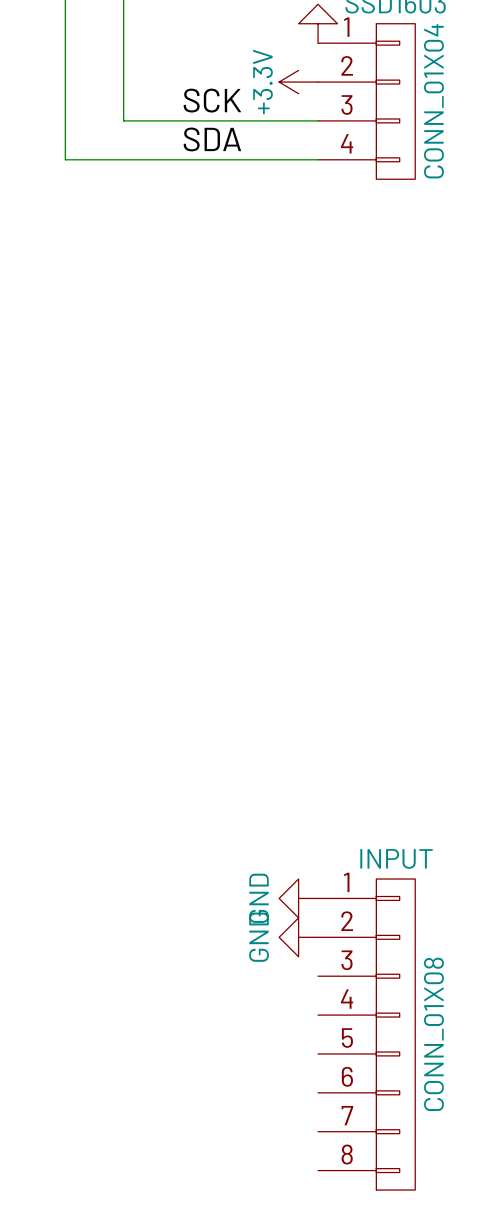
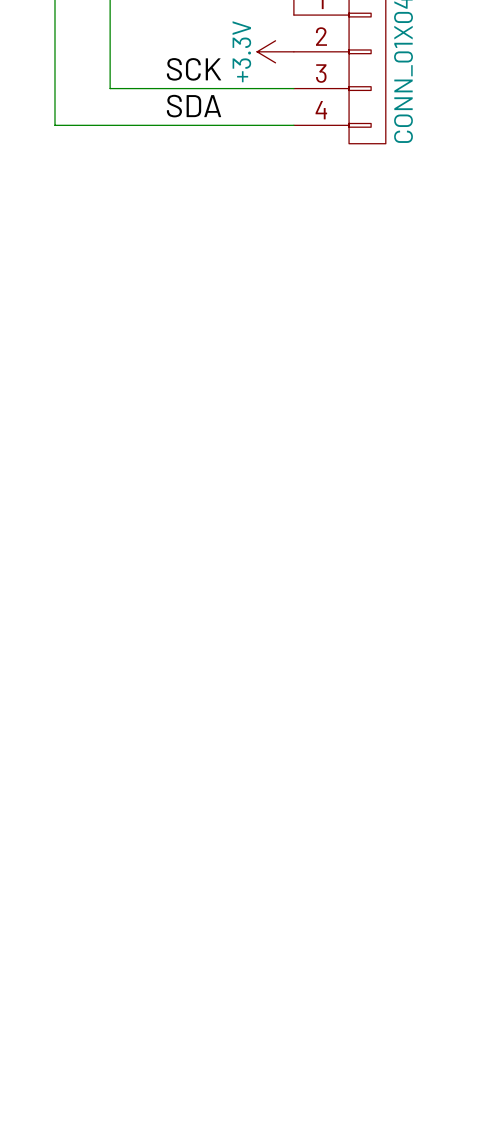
power symbol: GND (298, 898) -> none
power symbol: GND (298, 937) -> none
INPUT: CONN_01X08 (366, 1034) -> none

